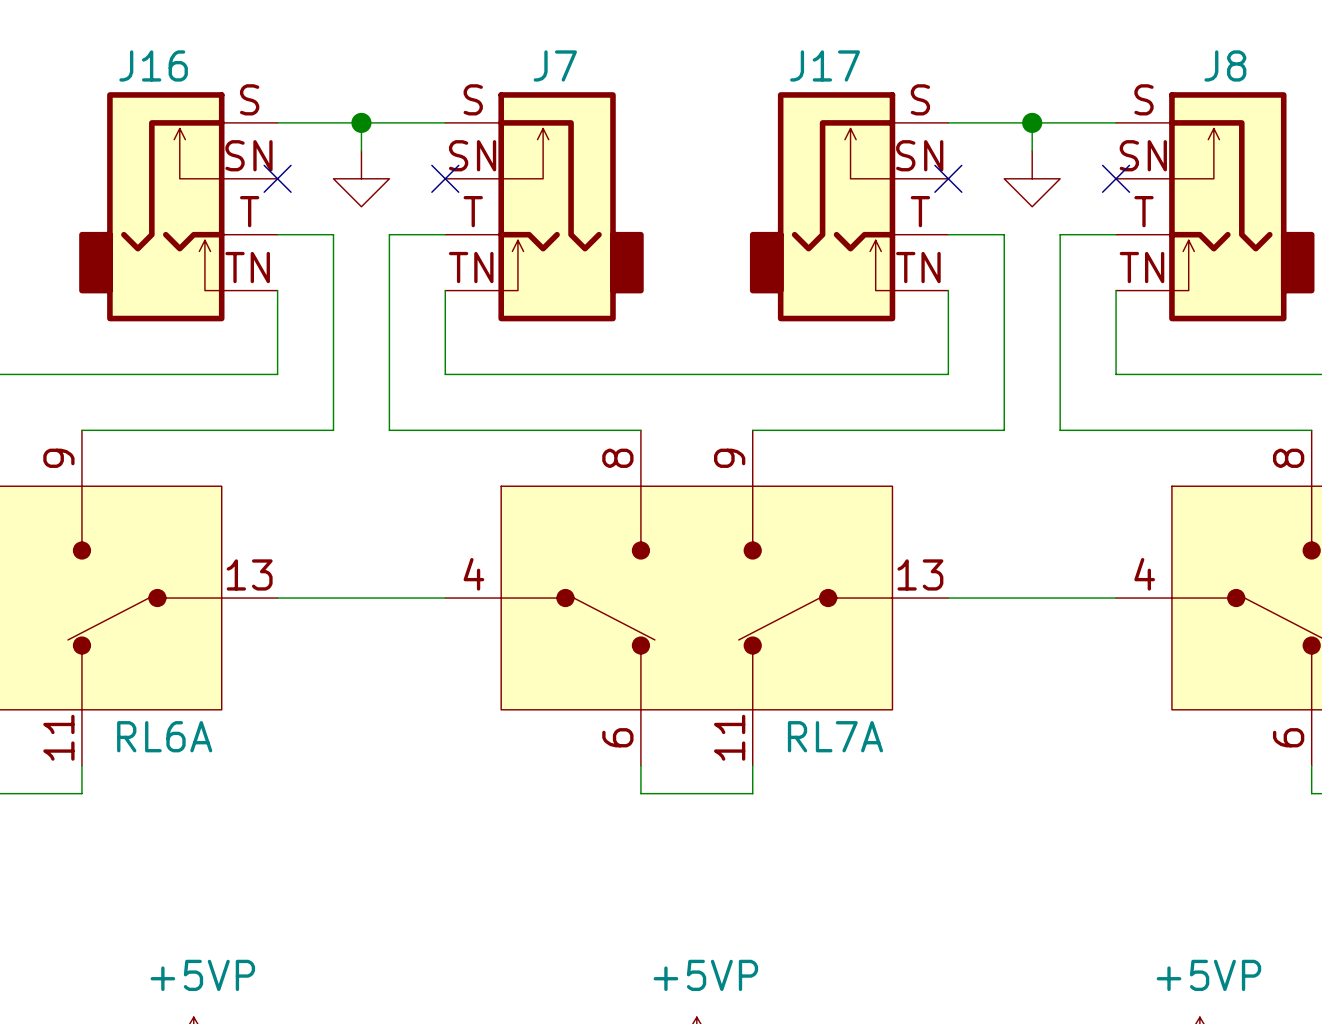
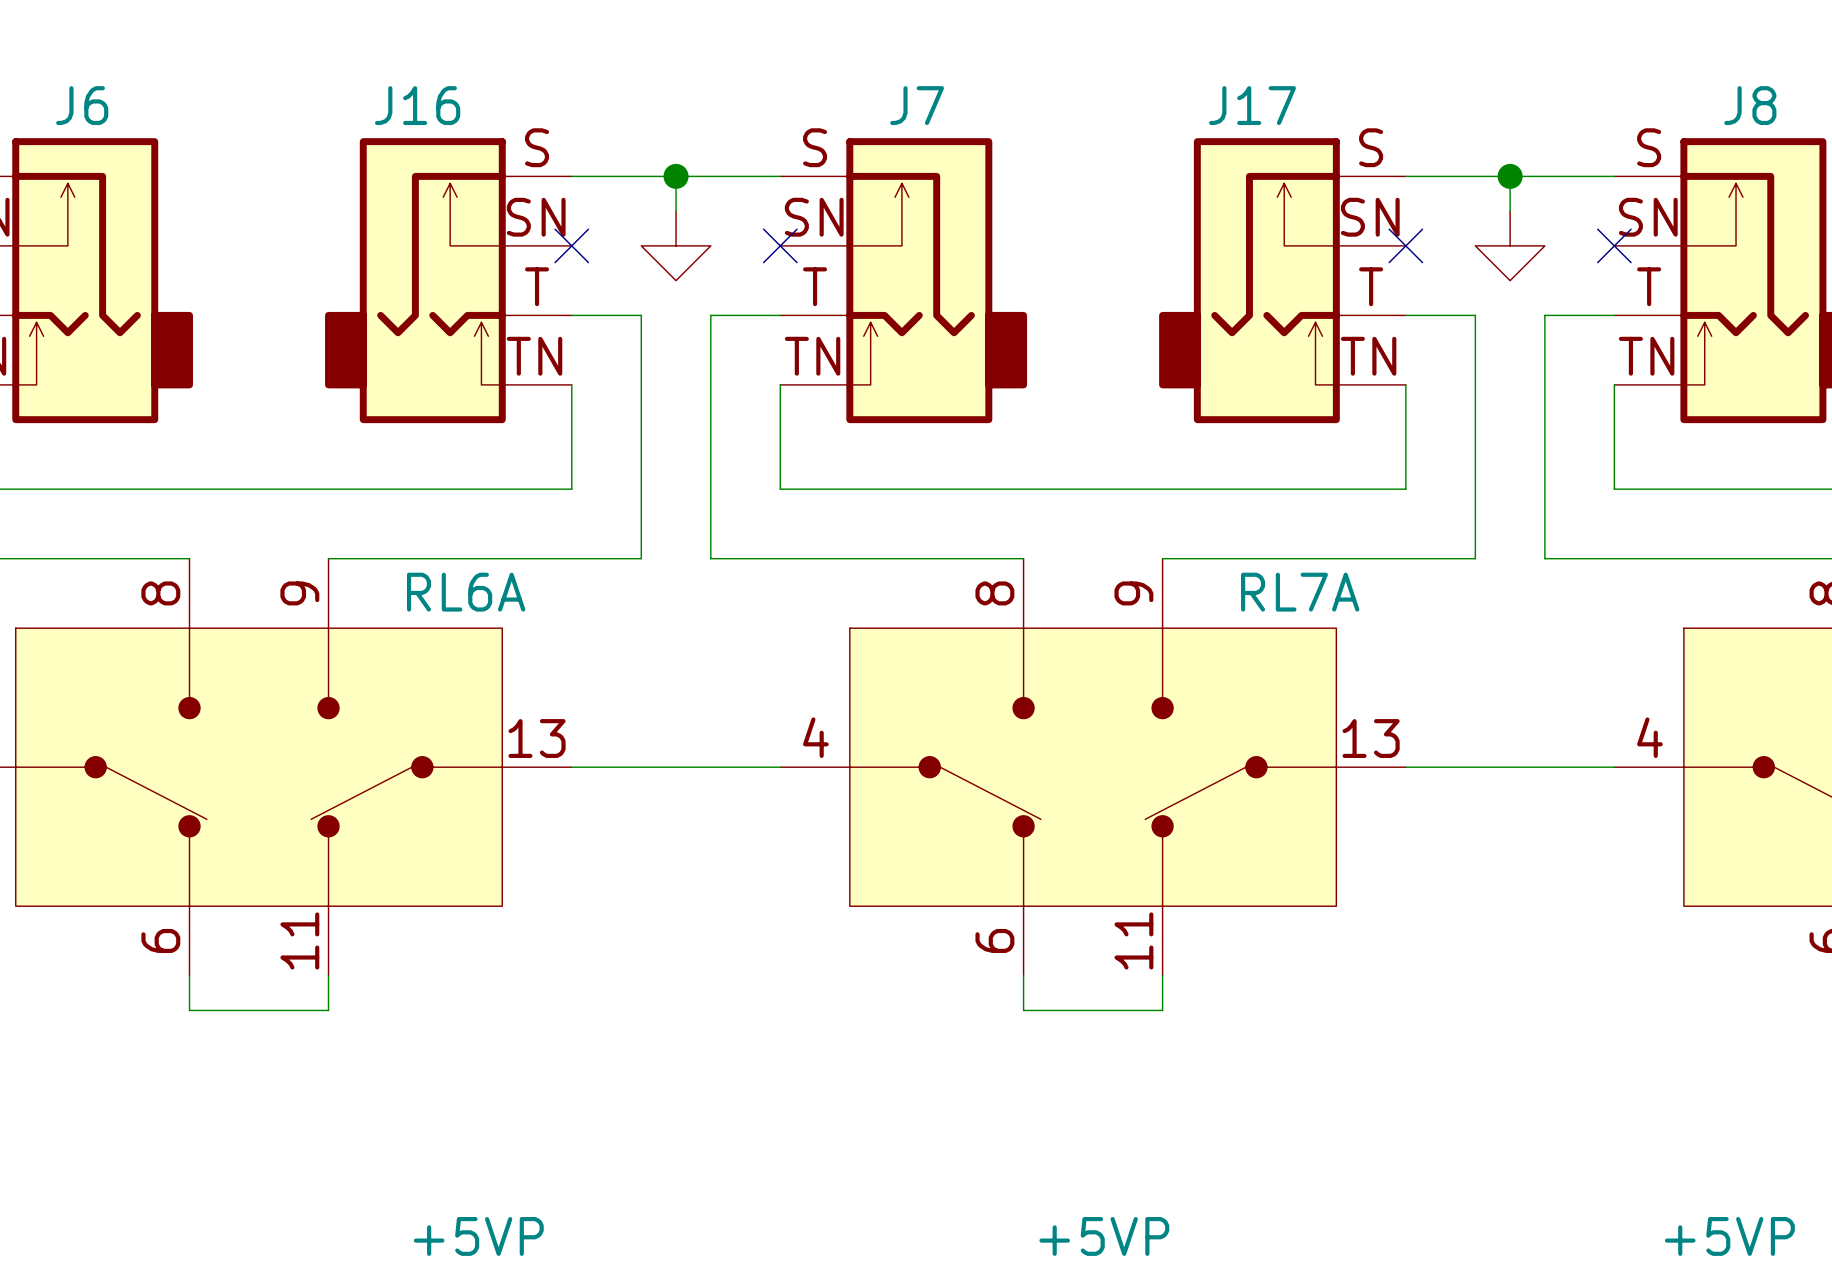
RL6A name position: RL6A (164, 736) -> RL6A (466, 592)
RL7A name position: RL7A (835, 736) -> RL7A (1300, 592)

